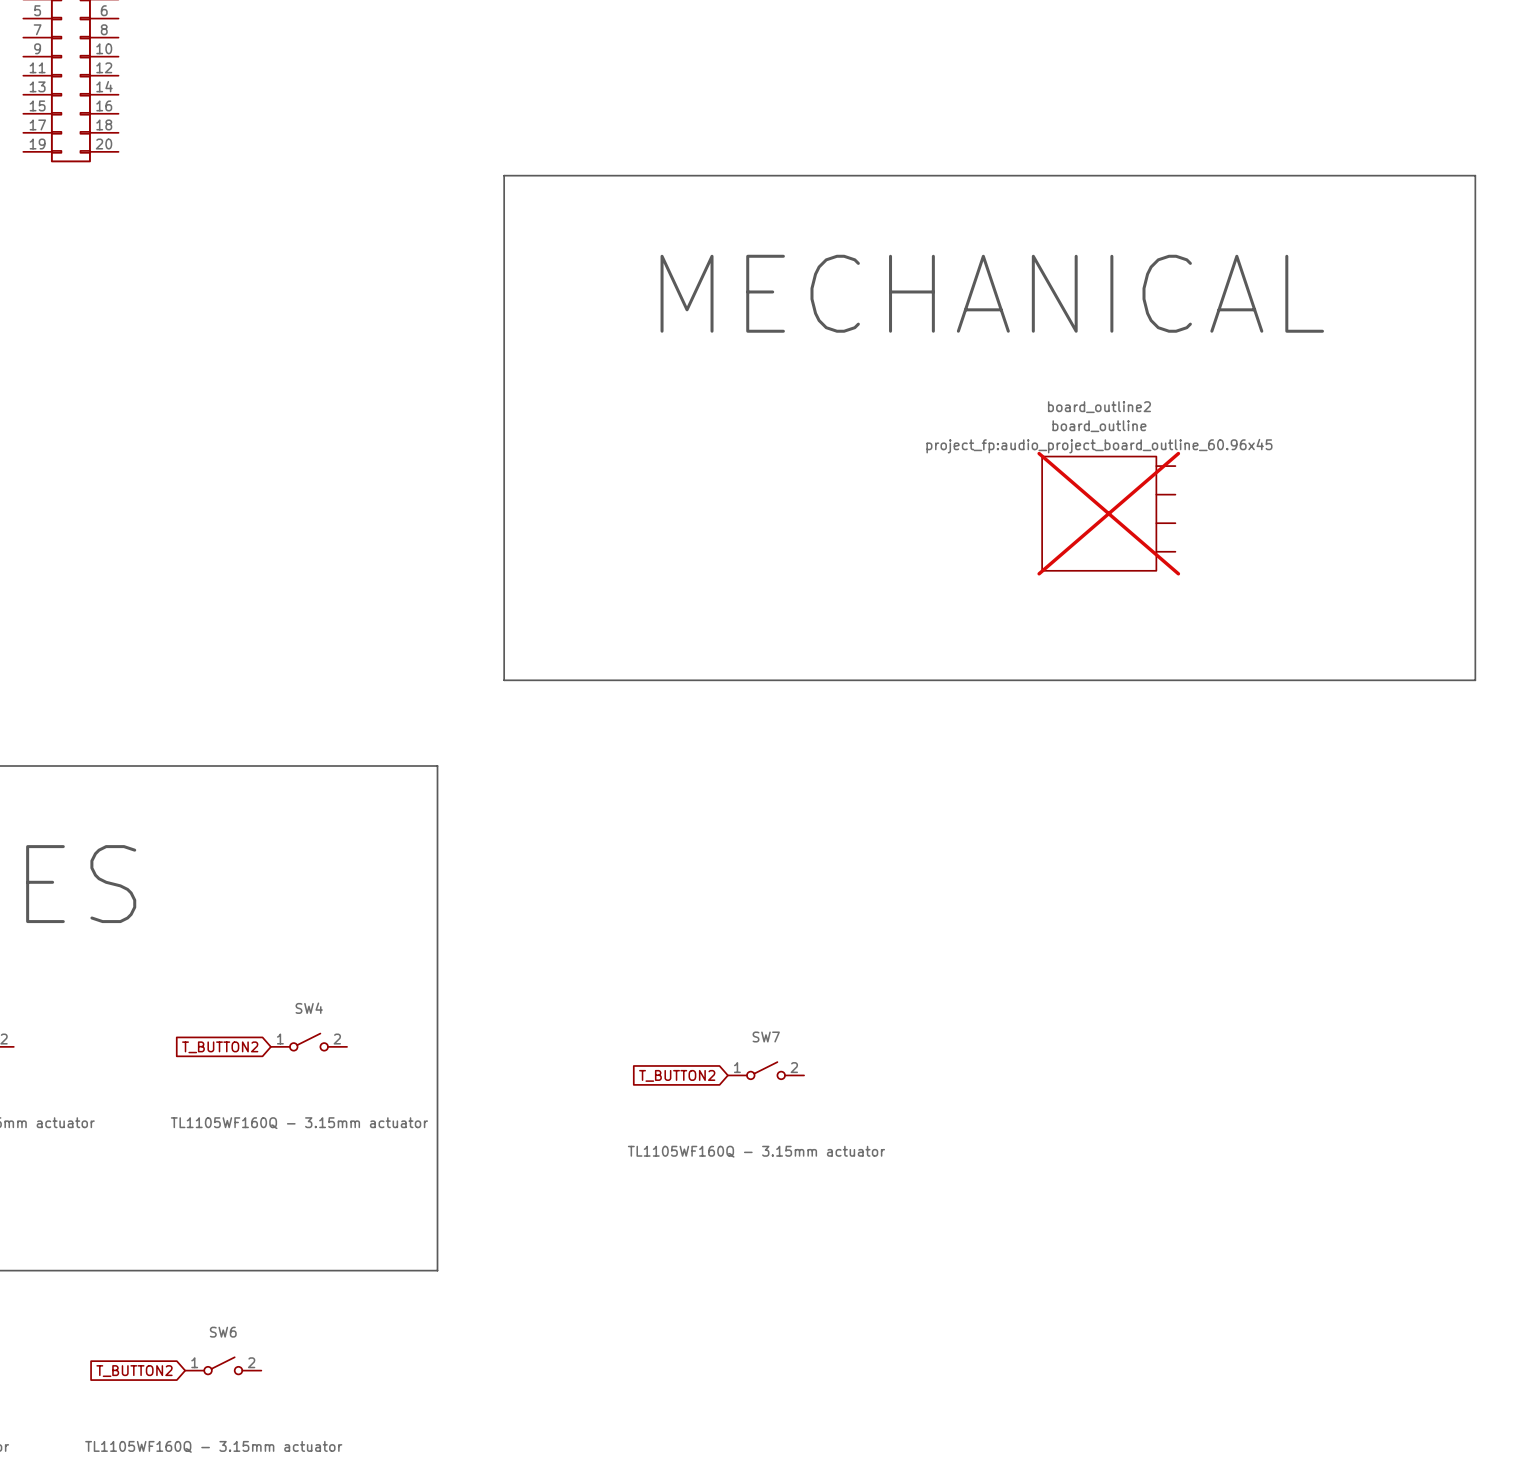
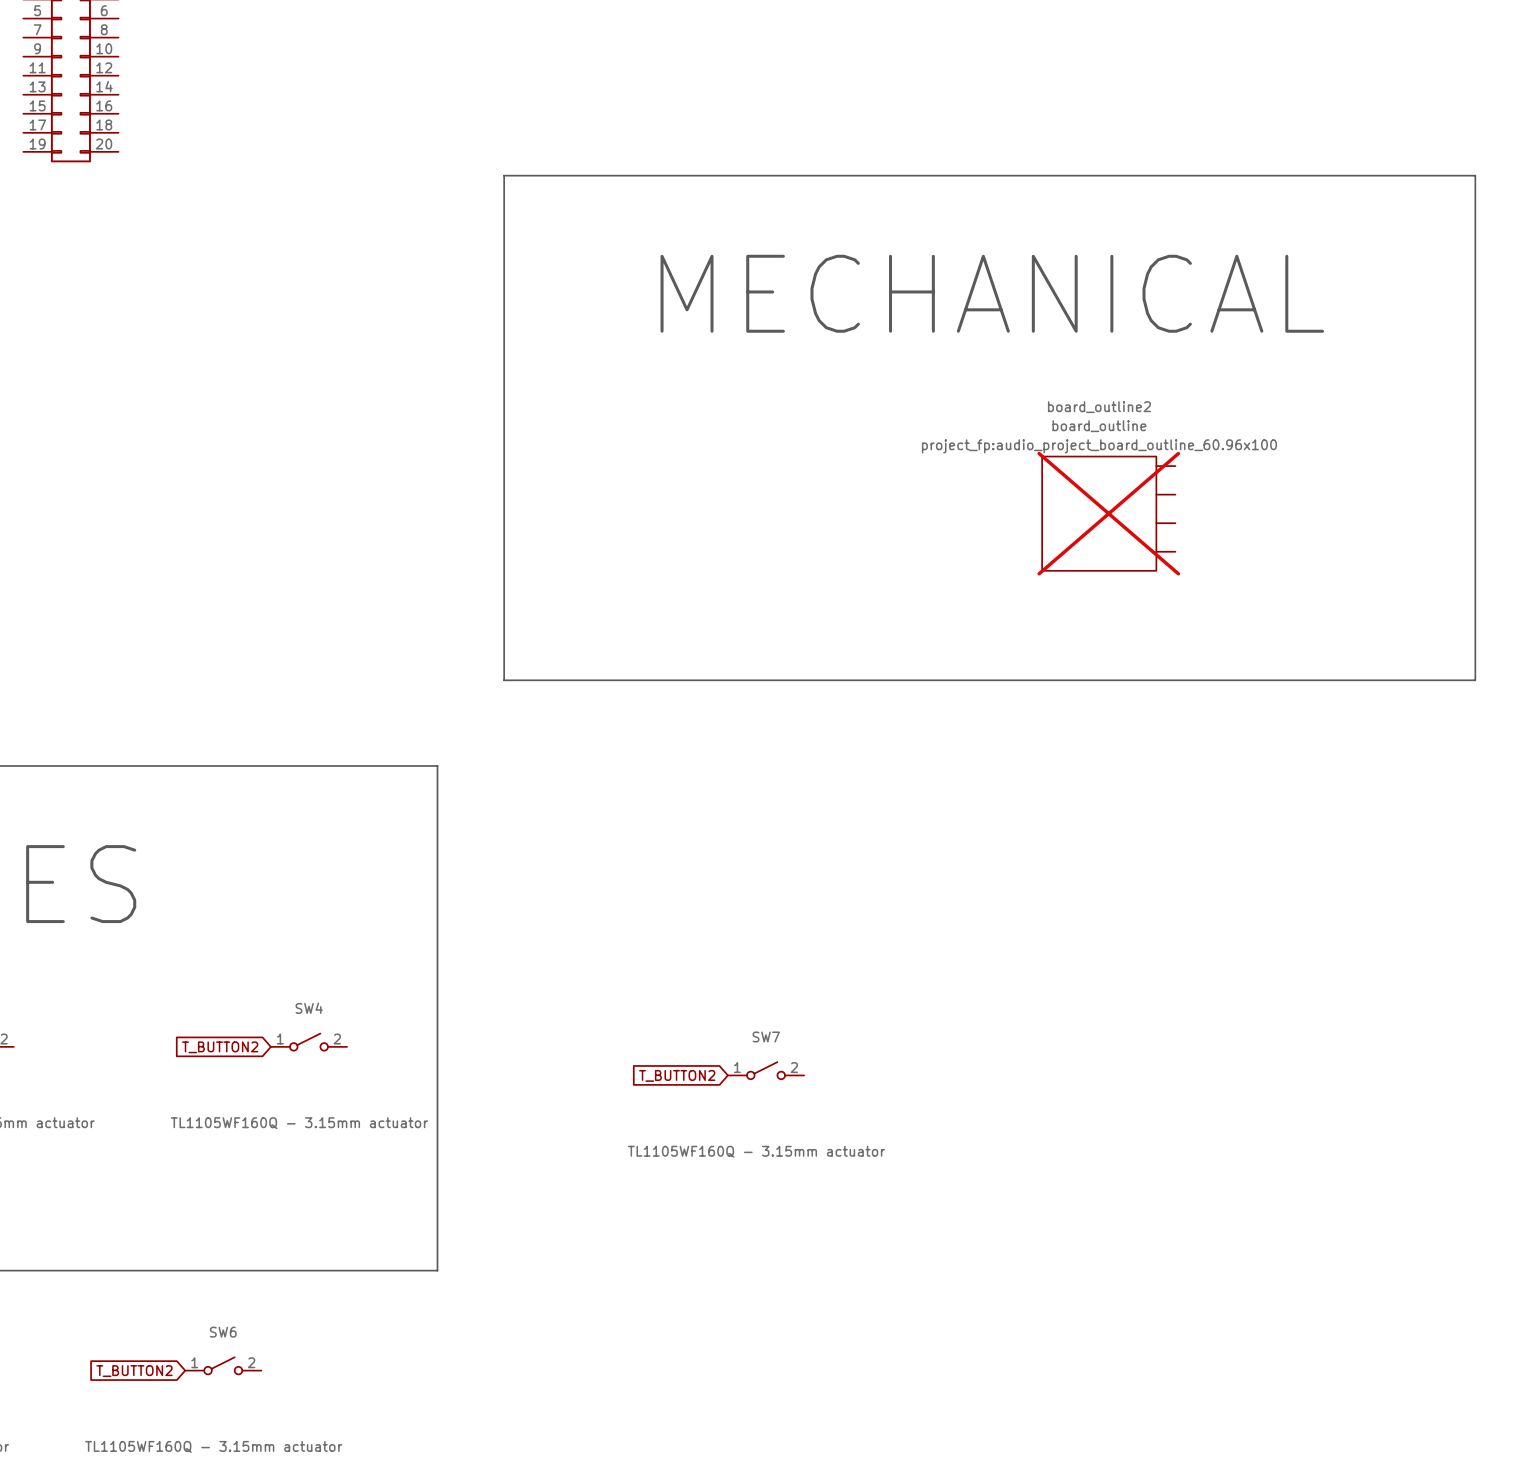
board_outline2 text: project_fp:audio_project_board_outline_60.96x45 (1099, 446) -> project_fp:audio_project_board_outline_60.96x100 (1099, 446)

